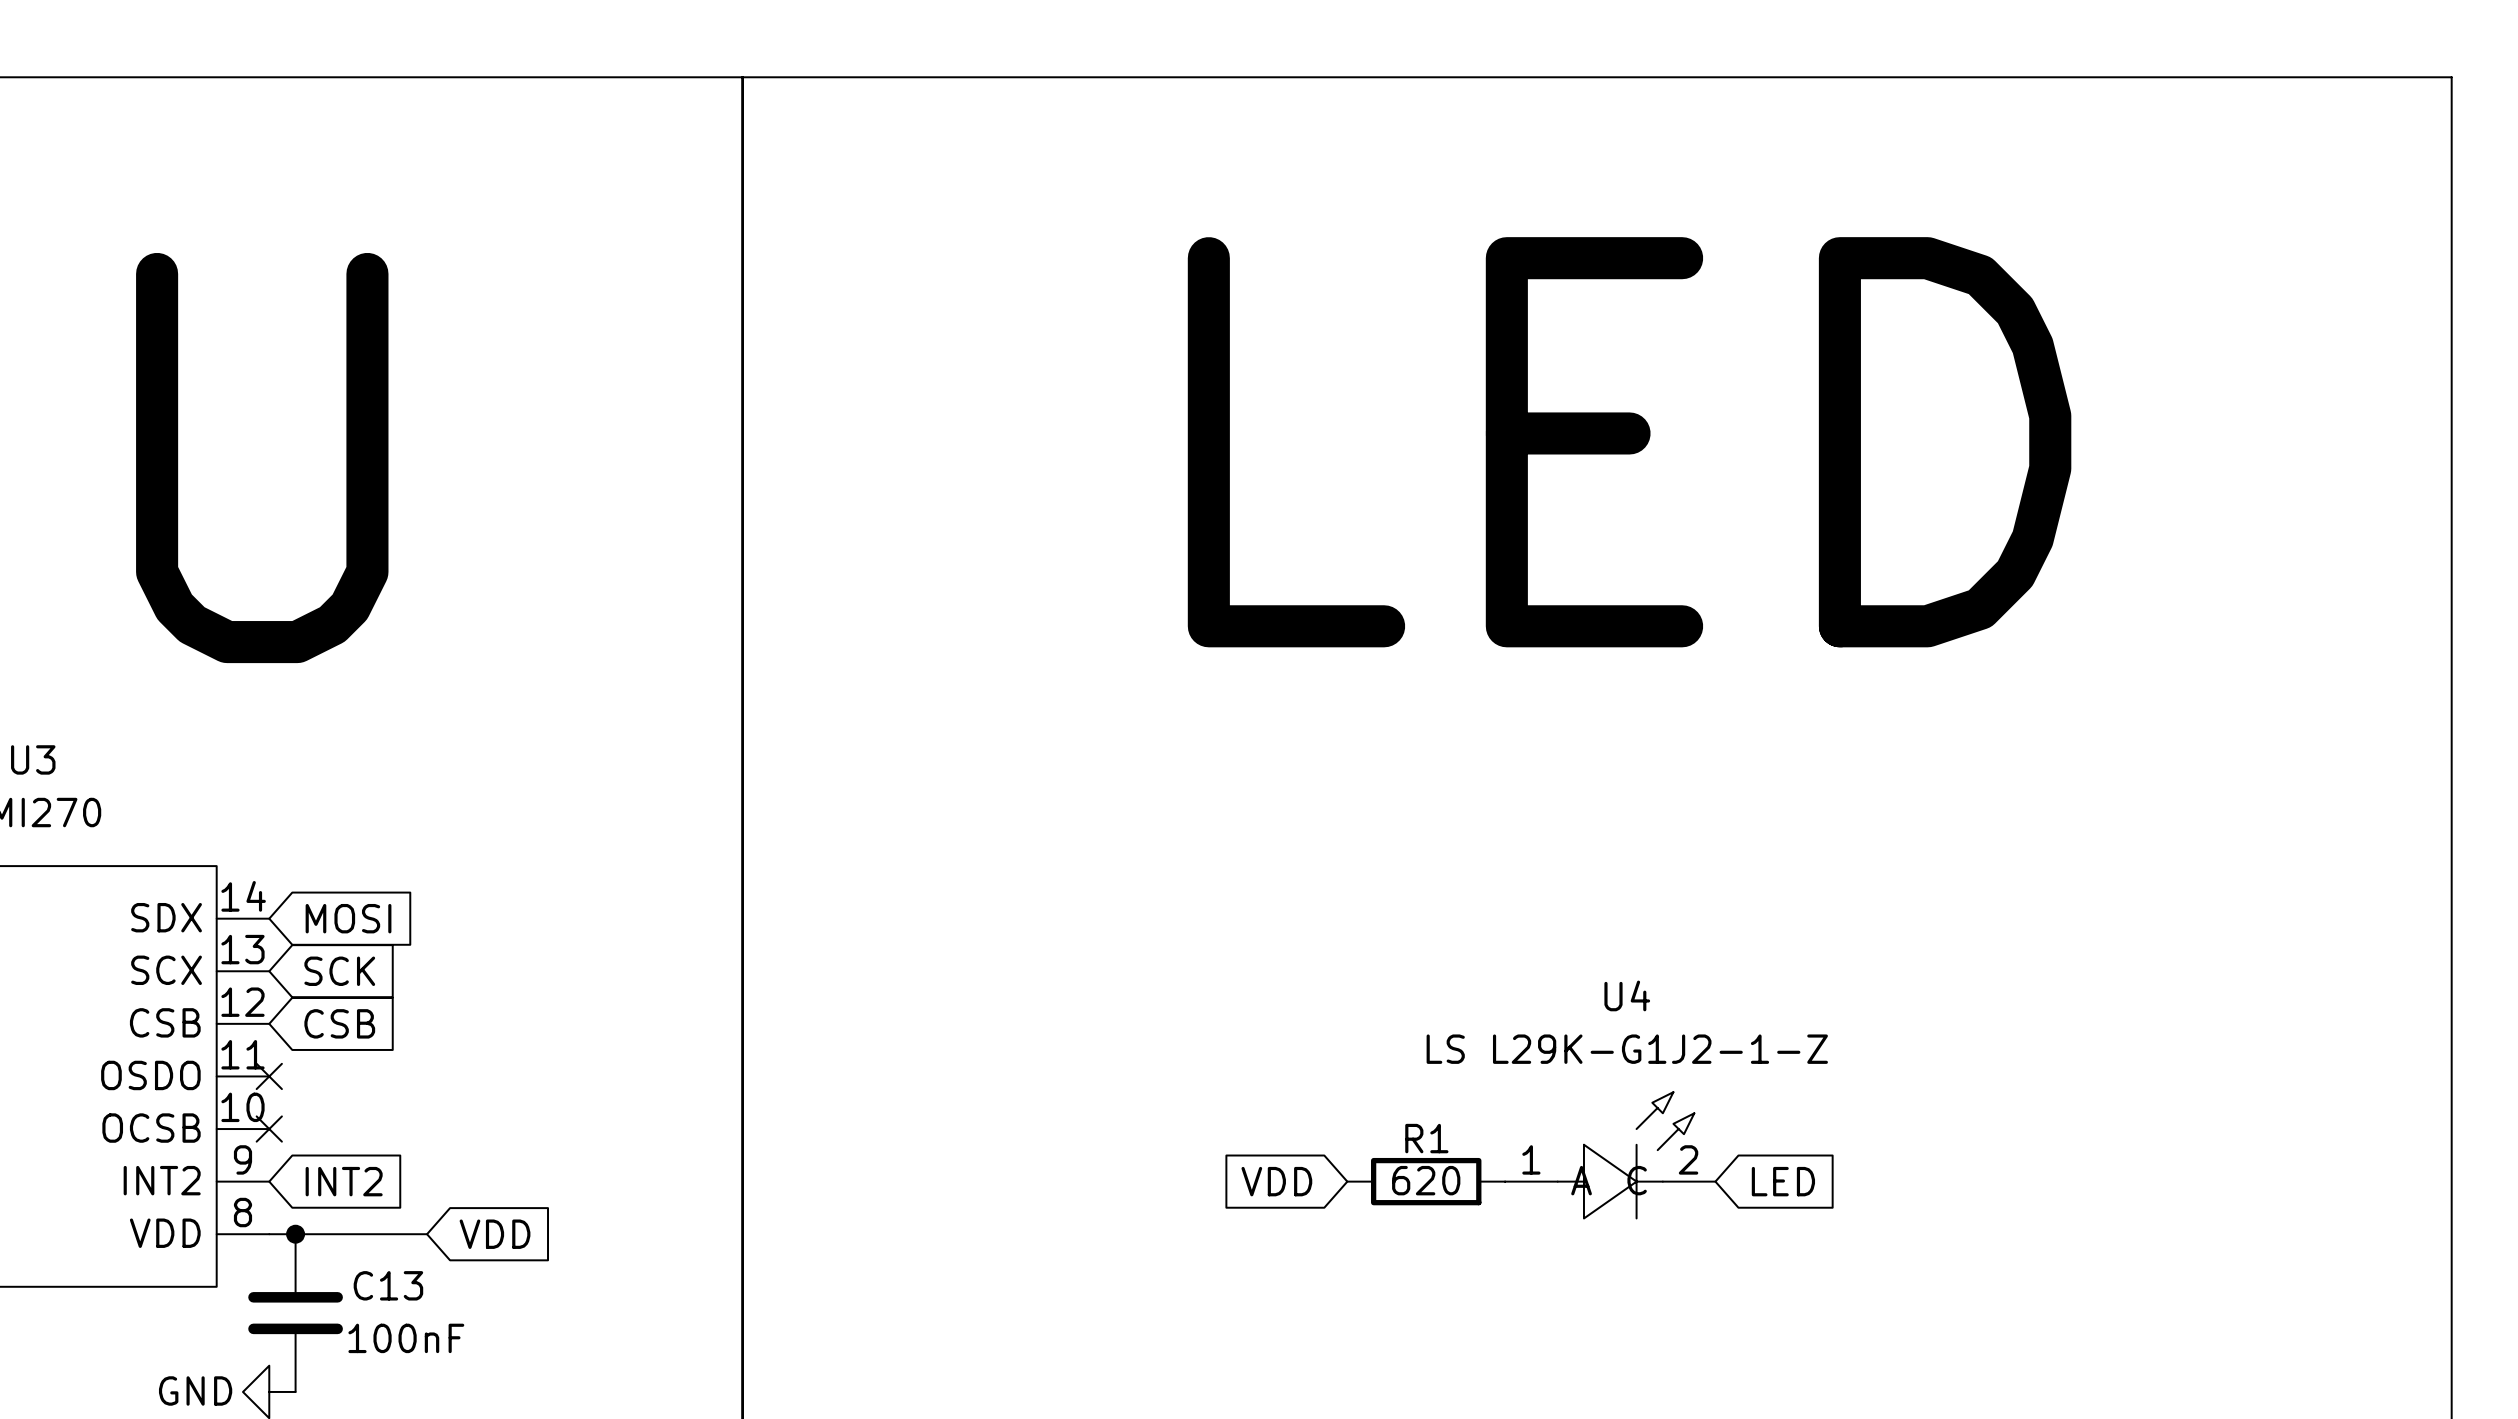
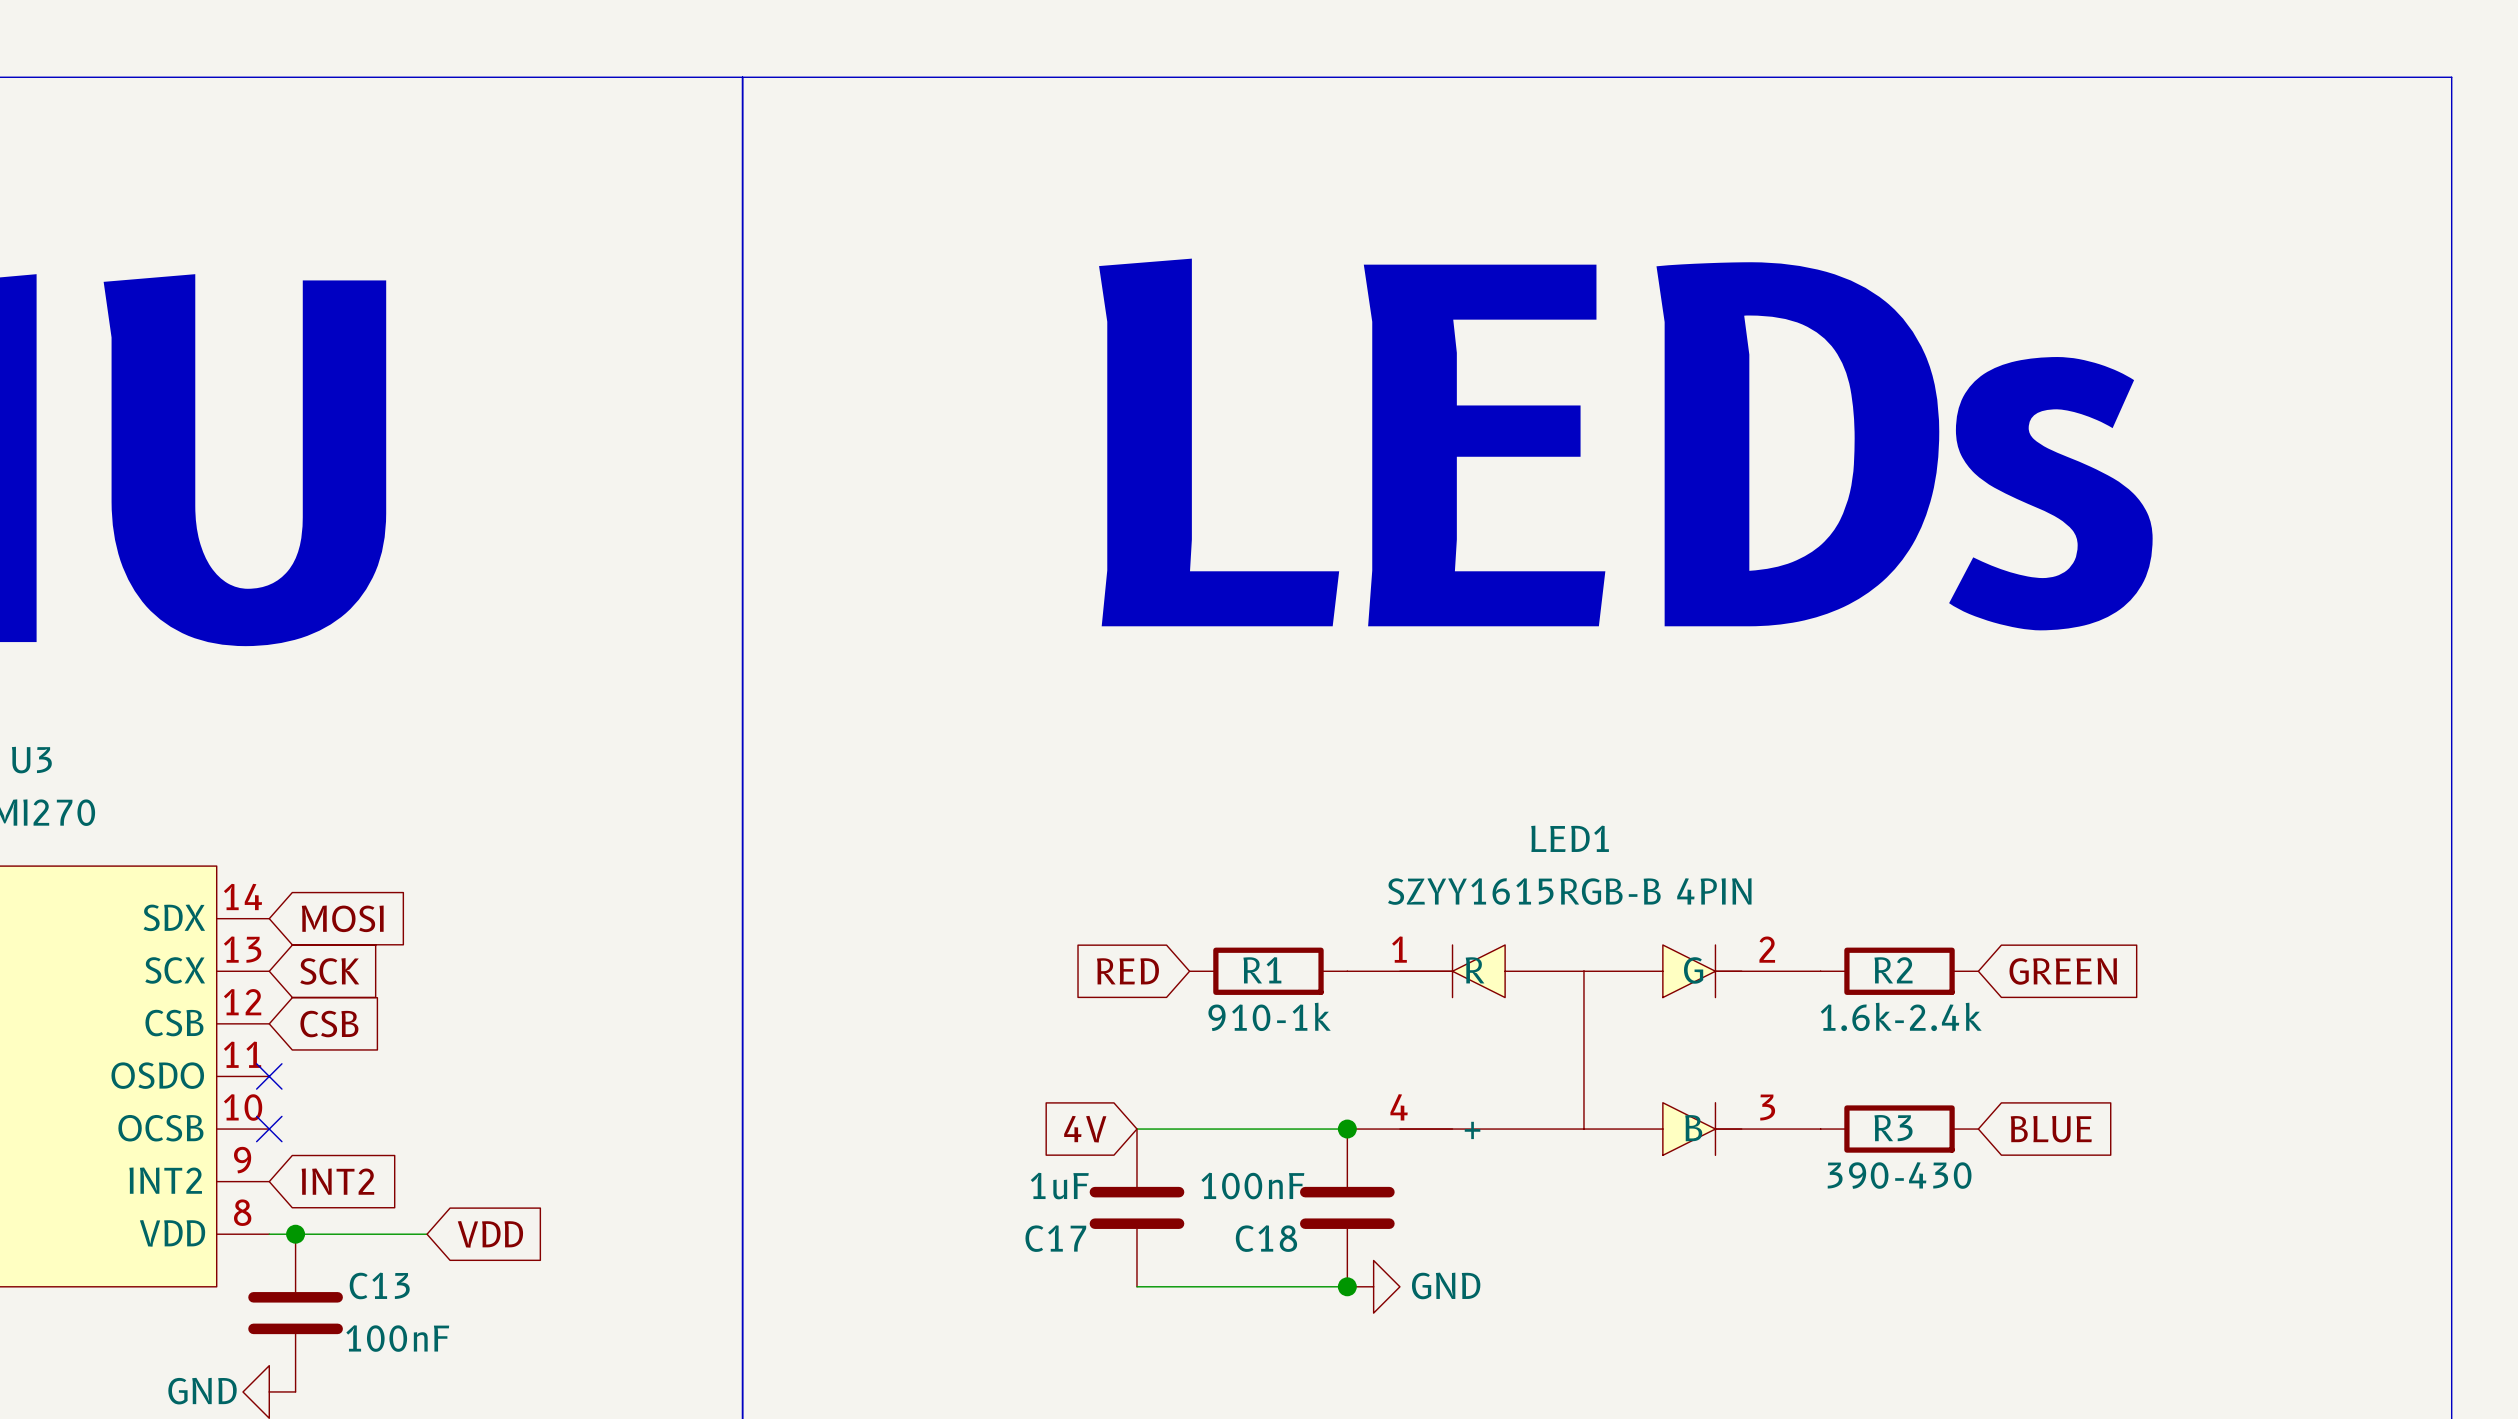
text: LED (1629, 442) -> LEDs (1625, 444)
global label: none -> RED (1127, 971)
R2: none -> 1.6k-2.4k (1899, 971)
global label: none -> GREEN (2063, 971)
LED1: none -> SZYY1615RGB-B 4PIN (1583, 1050)
global label: none -> 4V (1085, 1129)
wire: none -> (1136, 1129) (1347, 1129)
junction: none -> (1347, 1129)
R3: none -> 390-430 (1899, 1129)
global label: none -> BLUE (2051, 1129)
R1 name position: R1 (1426, 1138) -> R1 (1262, 970)
U4: LS L29K-G1J2-1-Z (1610, 1155) -> none
R1 value: 620 (1426, 1180) -> 910-1k (1269, 1016)
global label: VDD (1276, 1181) -> none
R1 position: (1426, 1181) -> (1268, 971)
global label: LED (1783, 1181) -> none
C17: none -> 1uF (1136, 1207)
C18: none -> 100nF (1347, 1207)
wire: none -> (1136, 1286) (1347, 1286)
junction: none -> (1347, 1286)
power symbol: none -> GND (1373, 1286)

